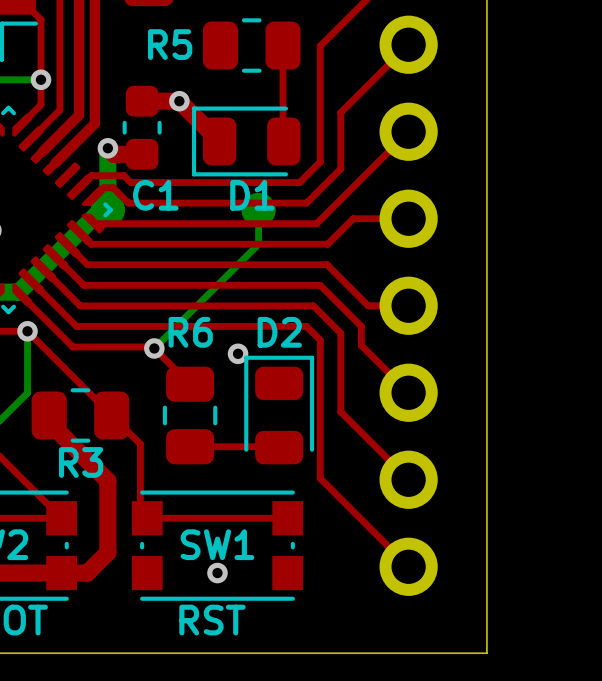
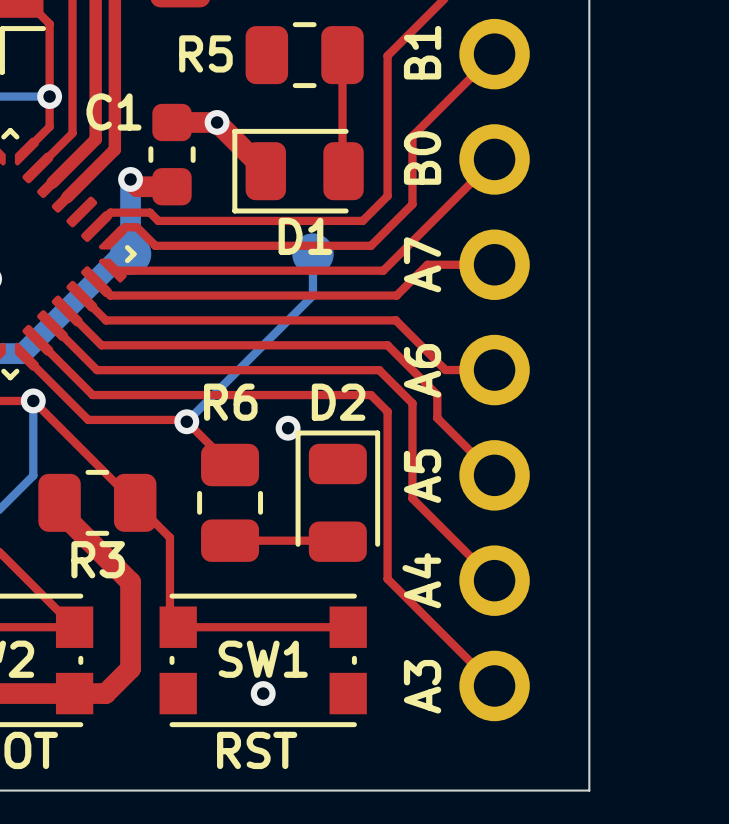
text: none -> B1 (422, 52)
text: none -> B0 (422, 158)
C1 name position: C1 (155, 195) -> C1 (113, 111)
text: none -> A7 (422, 264)
text: none -> A6 (422, 370)
text: none -> A5 (422, 476)
text: none -> A4 (421, 580)
text: none -> A3 (422, 686)

